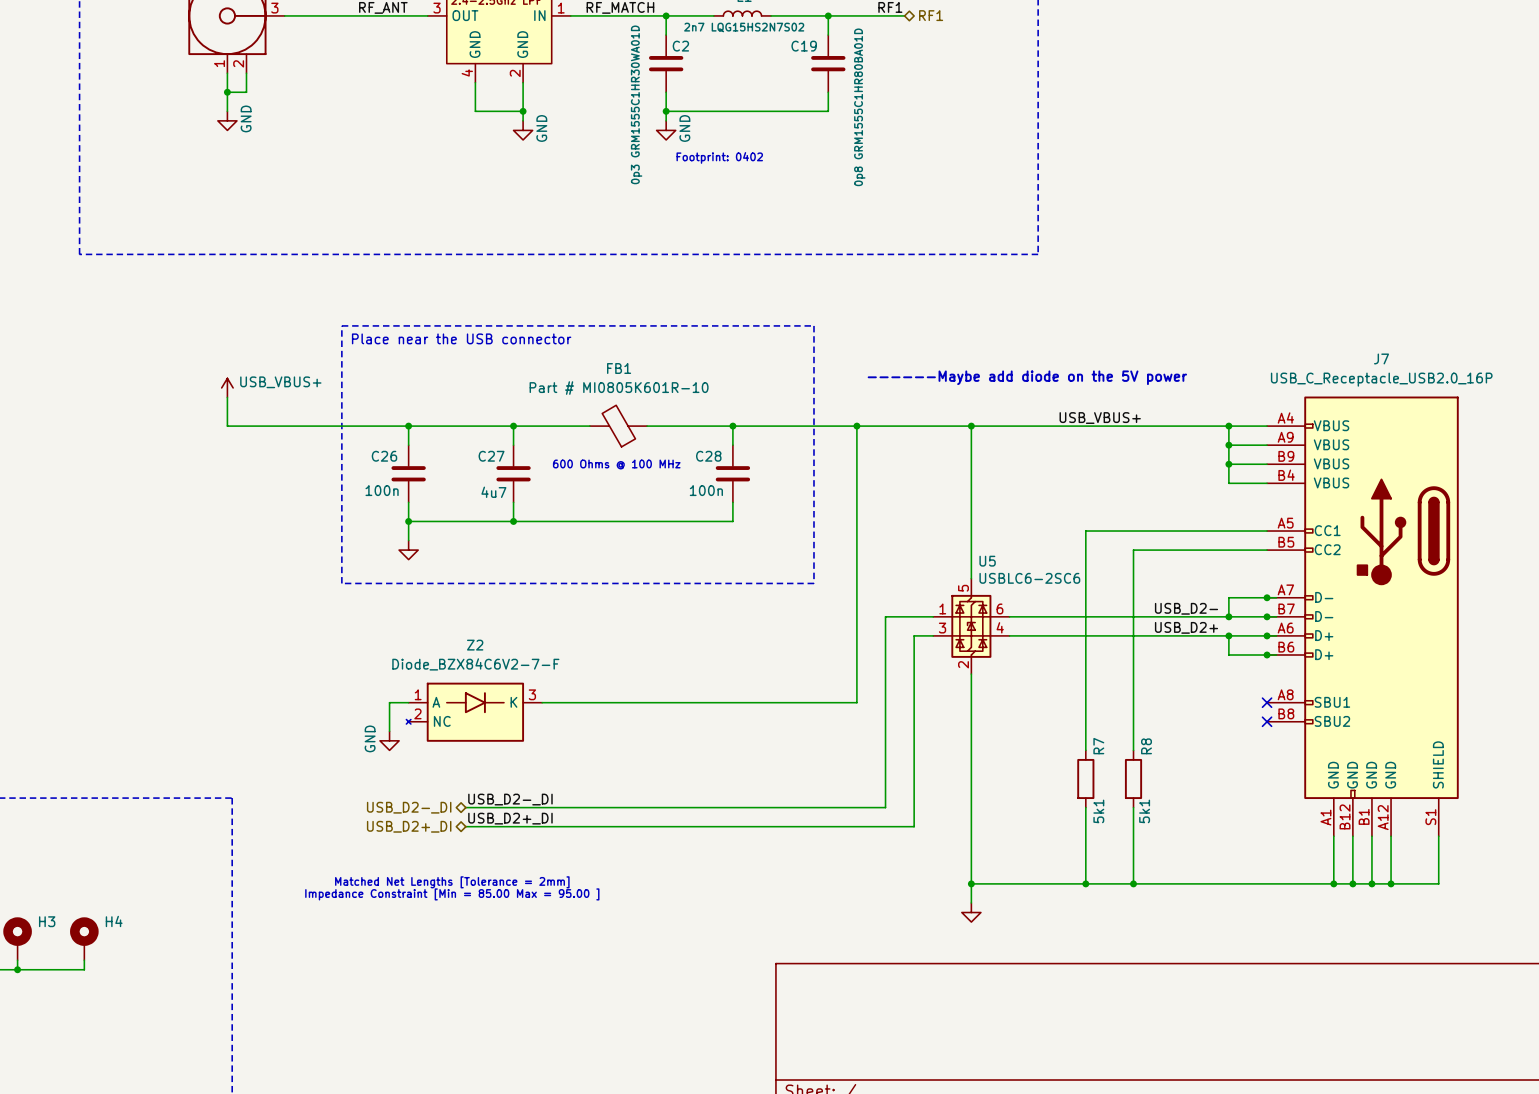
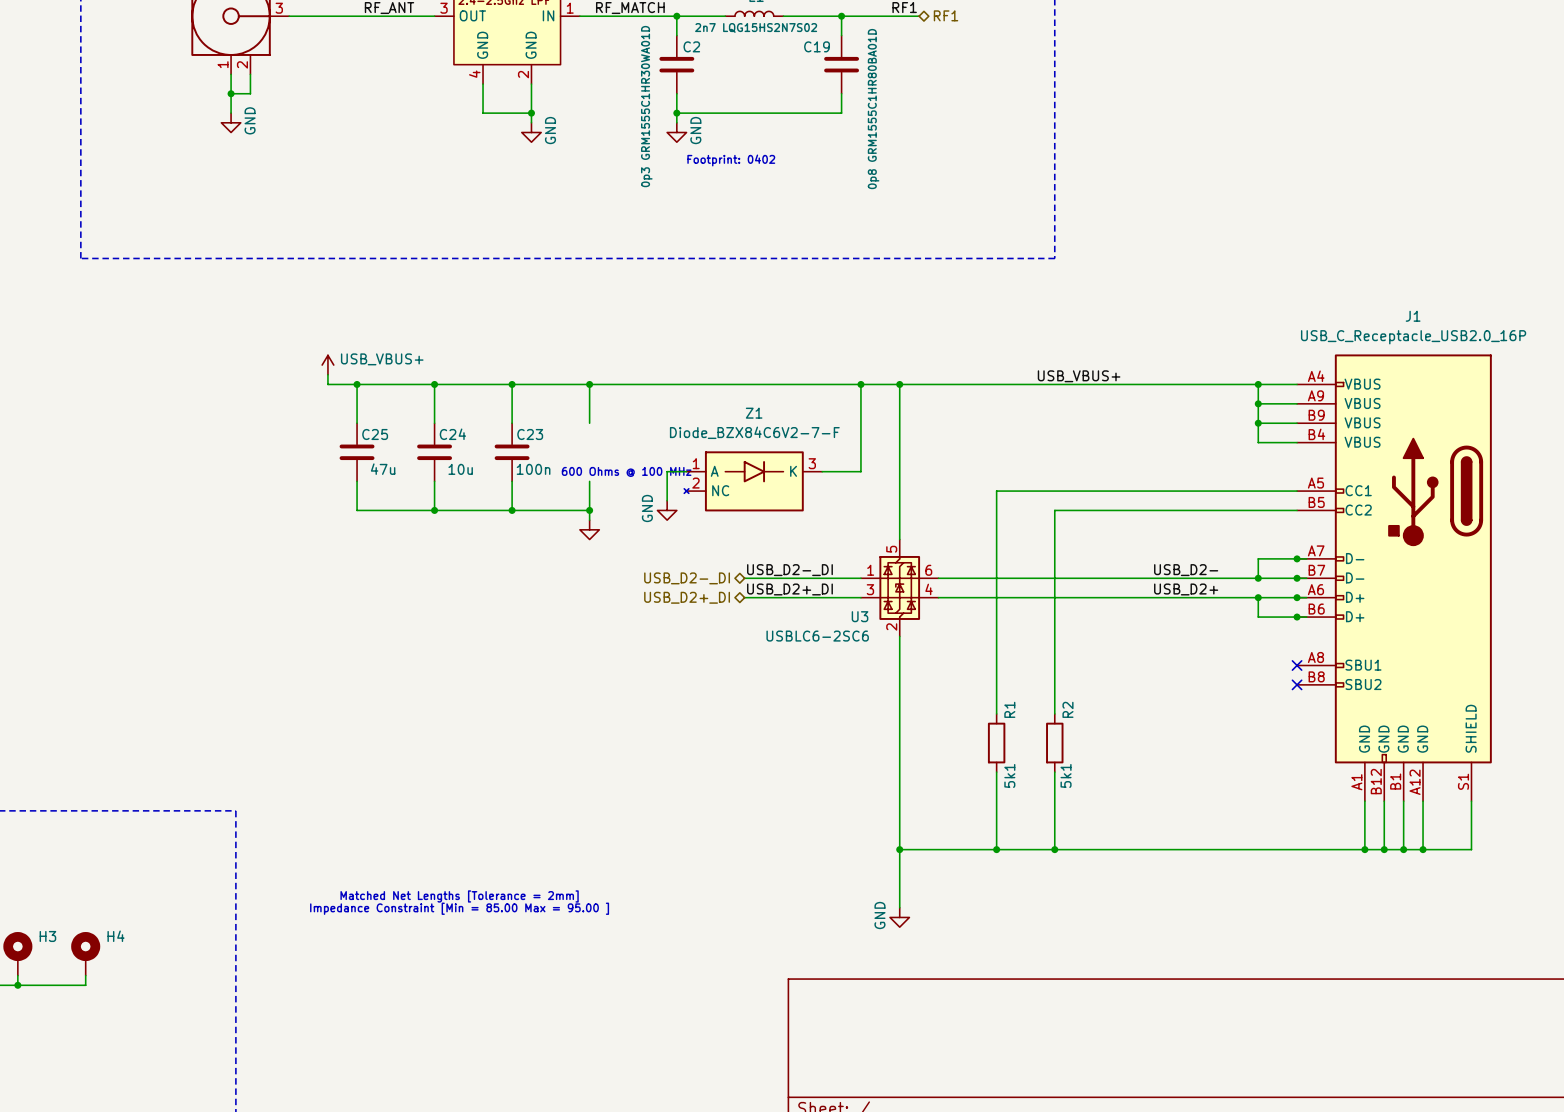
line: (341, 325) (813, 325) (813, 583) (341, 583) (341, 325) -> none
text: Place near the USB connector (461, 338) -> none
wire: none -> (327, 374) (327, 384) (1297, 384)
text: ------Maybe add diode on the 5V power (1027, 377) -> none
wire: none -> (357, 384) (357, 423)
junction: none -> (357, 384)
junction: none -> (434, 384)
wire: none -> (512, 384) (512, 423)
junction: none -> (512, 384)
wire: none -> (589, 384) (589, 423)
junction: none -> (589, 384)
wire: none -> (860, 384) (860, 471) (822, 471)
junction: none -> (860, 384)
junction: none -> (899, 384)
wire: none -> (1258, 384) (1258, 442) (1297, 442)
junction: none -> (1258, 384)
power symbol position: USB_VBUS+ (227, 387) -> USB_VBUS+ (327, 365)
wire: (227, 397) (227, 426) (589, 426) -> none
junction: none -> (1258, 403)
label position: USB_VBUS+ (1100, 418) -> USB_VBUS+ (1079, 376)
wire: (408, 426) (408, 445) -> none
junction: (408, 426) -> none
wire: (513, 426) (513, 445) -> none
junction: (513, 426) -> none
FB1: Part # MI0805K601R-10 (618, 426) -> none
wire: (647, 426) (1267, 426) -> none
wire: (732, 426) (732, 445) -> none
junction: (732, 426) -> none
wire: (856, 426) (856, 702) (542, 702) -> none
junction: (856, 426) -> none
wire: (971, 426) (971, 578) -> (899, 384) (899, 539)
junction: (971, 426) -> none
wire: (1228, 426) (1228, 483) -> (996, 713) (996, 491) (1248, 491)
junction position: (1228, 426) -> (1258, 423)
C25: none -> 47u (357, 452)
C24: none -> 10u (434, 452)
C23: none -> 100n (512, 452)
wire: (1228, 445) (1267, 445) -> (1258, 403) (1297, 403)
junction: (1228, 445) -> none
wire: none -> (686, 471) (667, 471) (667, 500)
wire: (1228, 464) (1267, 464) -> (1258, 423) (1297, 423)
junction: (1228, 464) -> none
wire: none -> (357, 481) (357, 510) (589, 510)
C26: 100n (408, 473) -> none
wire: none -> (434, 481) (434, 510)
wire: none -> (512, 481) (512, 510)
C27: 4u7 (513, 473) -> none
wire: none -> (589, 481) (589, 520)
C28: 100n (732, 473) -> none
Z1: none -> Diode_BZX84C6V2-7-F (753, 481)
wire: (408, 502) (408, 540) -> (434, 384) (434, 423)
wire: (513, 502) (513, 521) -> none
junction: none -> (589, 510)
power symbol: none -> GND (667, 510)
wire: (732, 502) (732, 521) (408, 521) -> none
wire: none -> (1297, 510) (1054, 510) (1054, 713)
junction position: (408, 521) -> (434, 510)
junction position: (513, 521) -> (512, 510)
wire: (1267, 531) (1085, 531) (1085, 750) -> none
power symbol position: (408, 550) -> (589, 529)
wire: (1238, 550) (1133, 550) (1133, 750) -> (1258, 558) (1258, 578)
junction: none -> (1297, 558)
label: none -> USB_D2-_DI (789, 570)
J1: none -> USB_C_Receptacle_USB2.0_16P (1394, 577)
hierarchical label: none -> USB_D2-_DI (687, 578)
wire: none -> (744, 578) (860, 578)
wire: none -> (938, 578) (1306, 578)
junction: none -> (1258, 578)
junction: none -> (1297, 578)
U3: none -> USBLC6-2SC6 (899, 587)
label: none -> USB_D2+_DI (789, 589)
hierarchical label: none -> USB_D2+_DI (687, 597)
wire: none -> (744, 597) (860, 597)
wire: none -> (938, 597) (1306, 597)
junction: none -> (1258, 597)
junction: none -> (1297, 597)
junction: (1267, 597) -> none
wire: (1276, 597) (1228, 597) (1228, 616) -> none
junction: none -> (1297, 617)
label position: USB_D2- (1186, 608) -> USB_D2- (1186, 570)
wire: (933, 616) (885, 616) (885, 626) -> none
wire: (1009, 616) (1276, 616) -> none
junction: (1228, 616) -> none
junction: (1267, 616) -> none
J7: USB_C_Receptacle_USB2.0_16P (1362, 616) -> none
U5: USBLC6-2SC6 (971, 626) -> none
label position: USB_D2+ (1186, 627) -> USB_D2+ (1186, 589)
wire: (933, 635) (914, 635) (914, 826) (465, 826) -> none
wire: (1009, 635) (1276, 635) -> none
wire: (1228, 635) (1228, 655) (1276, 655) -> (1258, 597) (1258, 617) (1306, 617)
junction: (1228, 635) -> none
junction: (1267, 635) -> none
junction: (1267, 655) -> none
no-connect mark: none -> (1297, 665)
wire: (971, 674) (971, 902) -> none
no-connect mark: none -> (1297, 684)
wire: (408, 702) (389, 702) (389, 731) -> none
no-connect mark: (1267, 702) -> none
Z2: Diode_BZX84C6V2-7-F (474, 712) -> none
no-connect mark: (1267, 721) -> none
R1: none -> 5k1 (996, 743)
R2: none -> 5k1 (1054, 743)
power symbol: GND (389, 740) -> none
R7: 5k1 (1085, 778) -> none
R8: 5k1 (1133, 778) -> none
wire: none -> (1471, 801) (1471, 849) (899, 849)
label: USB_D2-_DI (510, 799) -> none
hierarchical label: USB_D2-_DI (409, 807) -> none
wire: (465, 807) (885, 807) -> (899, 907) (899, 820)
wire: (1085, 807) (1085, 883) -> (1054, 772) (1054, 849)
wire: (1133, 807) (1133, 883) -> (996, 772) (996, 849)
label: USB_D2+_DI (510, 818) -> none
hierarchical label: USB_D2+_DI (409, 826) -> none
junction: none -> (899, 849)
junction: none -> (996, 849)
junction: none -> (1054, 849)
wire: (1333, 836) (1333, 883) -> (1364, 801) (1364, 849)
junction: none -> (1364, 849)
wire: (1352, 836) (1352, 883) -> (1384, 801) (1384, 849)
junction: none -> (1384, 849)
wire: (1371, 836) (1371, 883) -> (1403, 801) (1403, 849)
junction: none -> (1403, 849)
wire: (1391, 836) (1391, 883) -> (1423, 801) (1423, 849)
junction: none -> (1423, 849)
wire: (1438, 836) (1438, 883) (971, 883) -> none
junction: (971, 883) -> none
junction: (1085, 883) -> none
junction: (1133, 883) -> none
junction: (1333, 883) -> none
junction: (1352, 883) -> none
junction: (1371, 883) -> none
junction: (1391, 883) -> none
power symbol: none -> GND (899, 917)
power symbol: (971, 912) -> none

